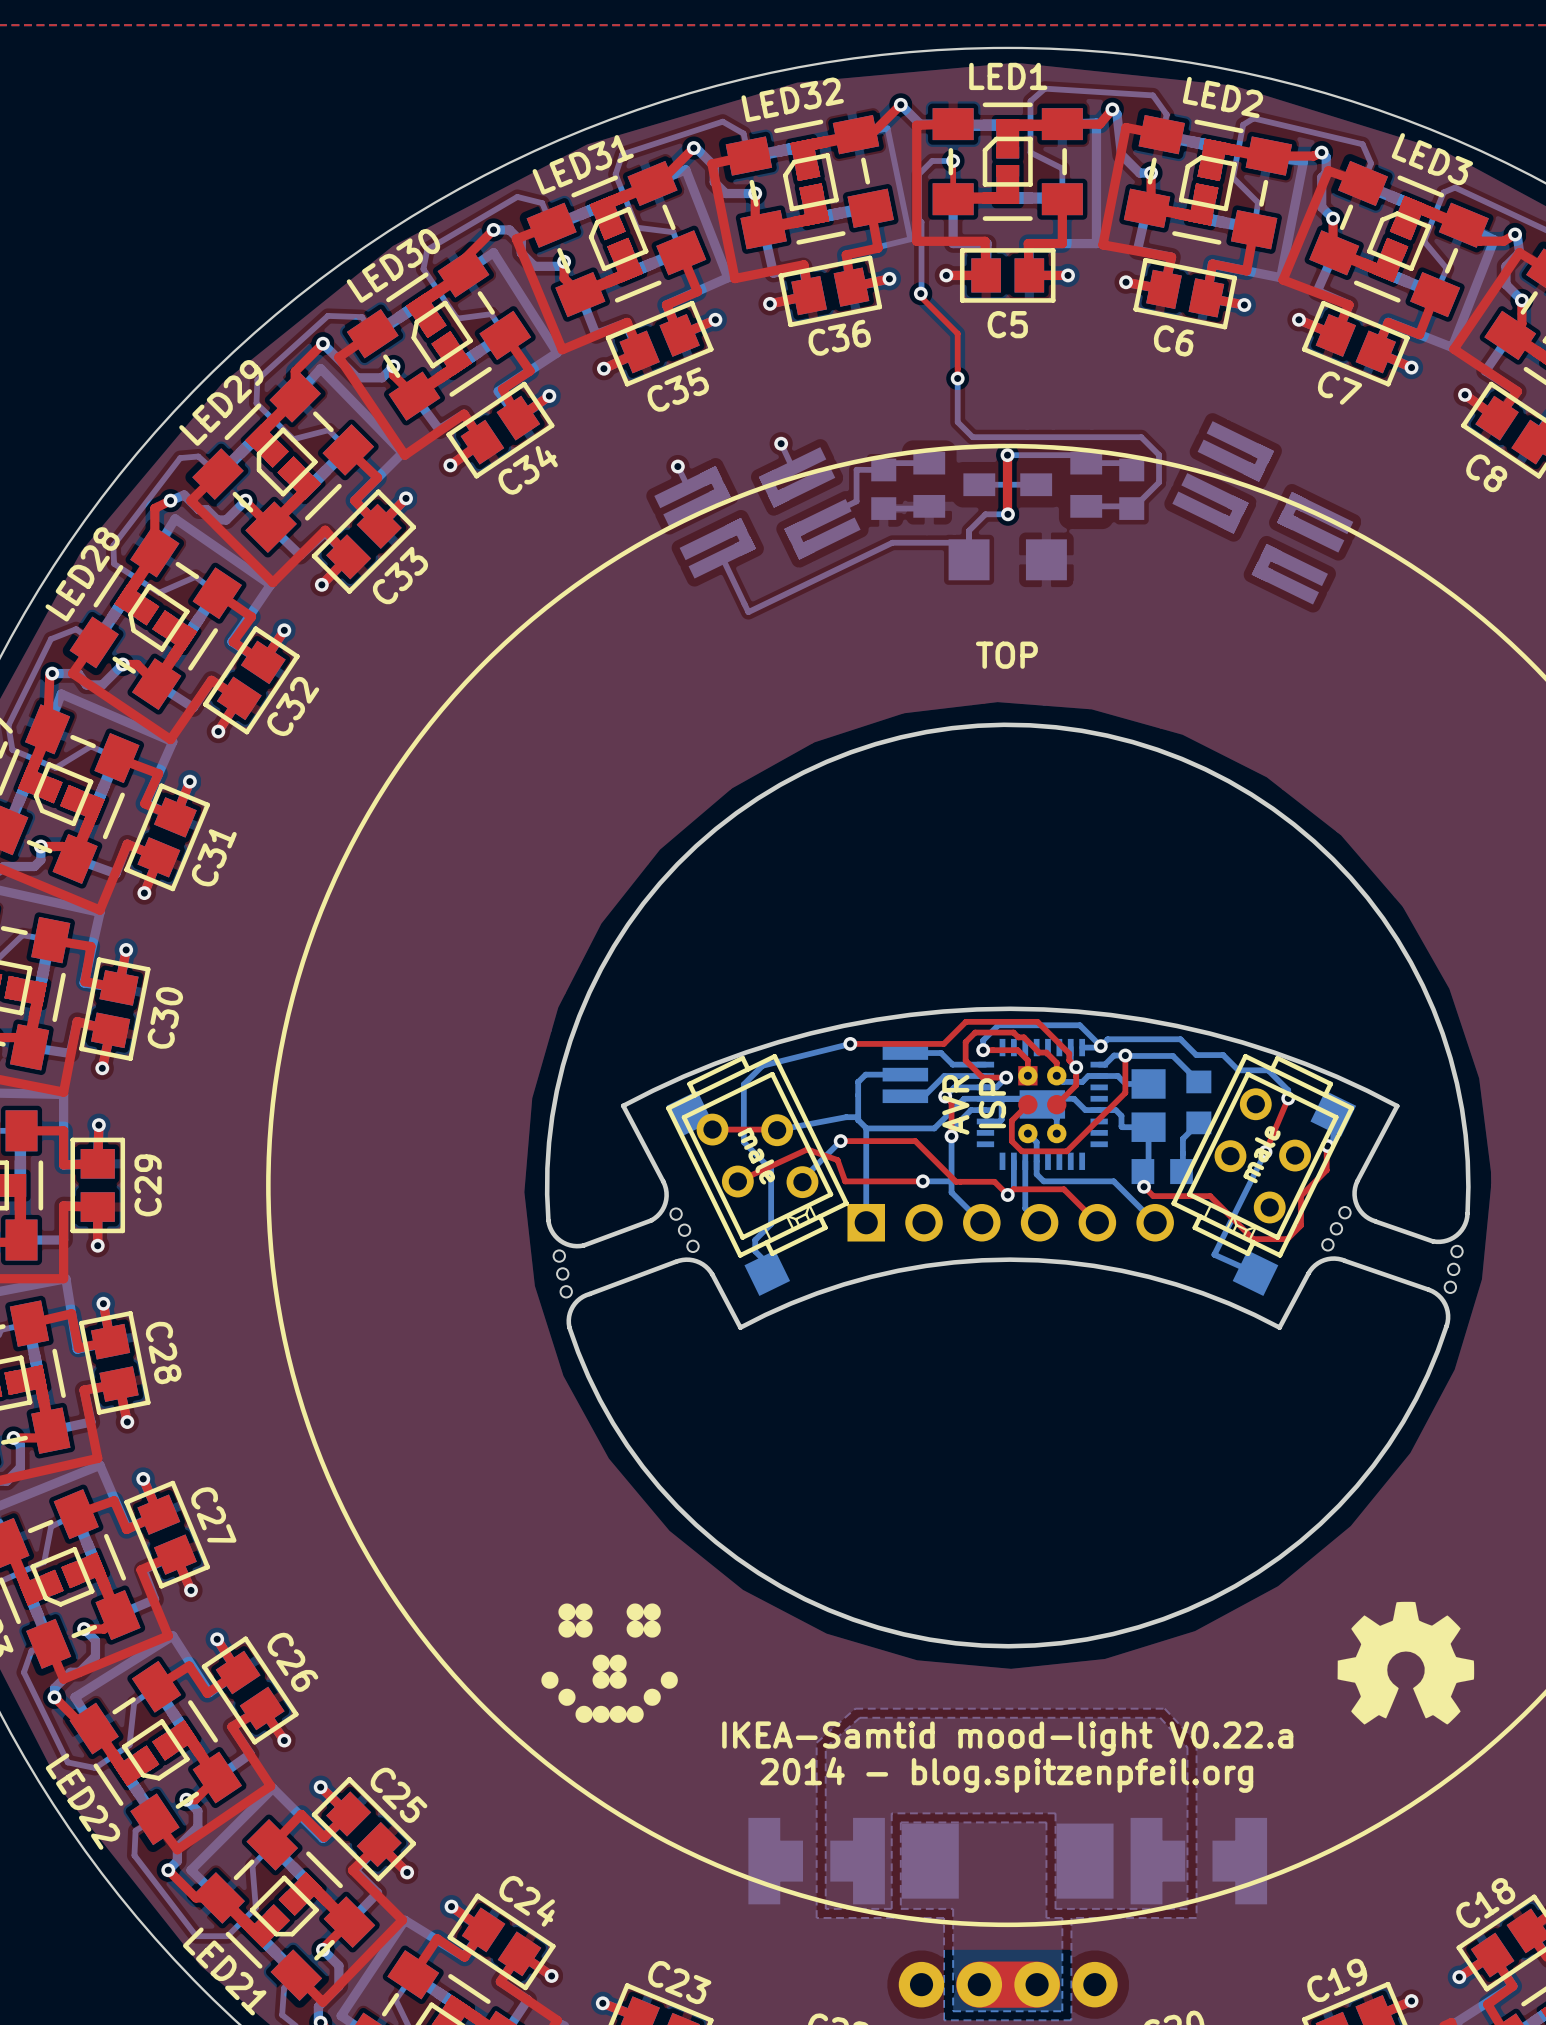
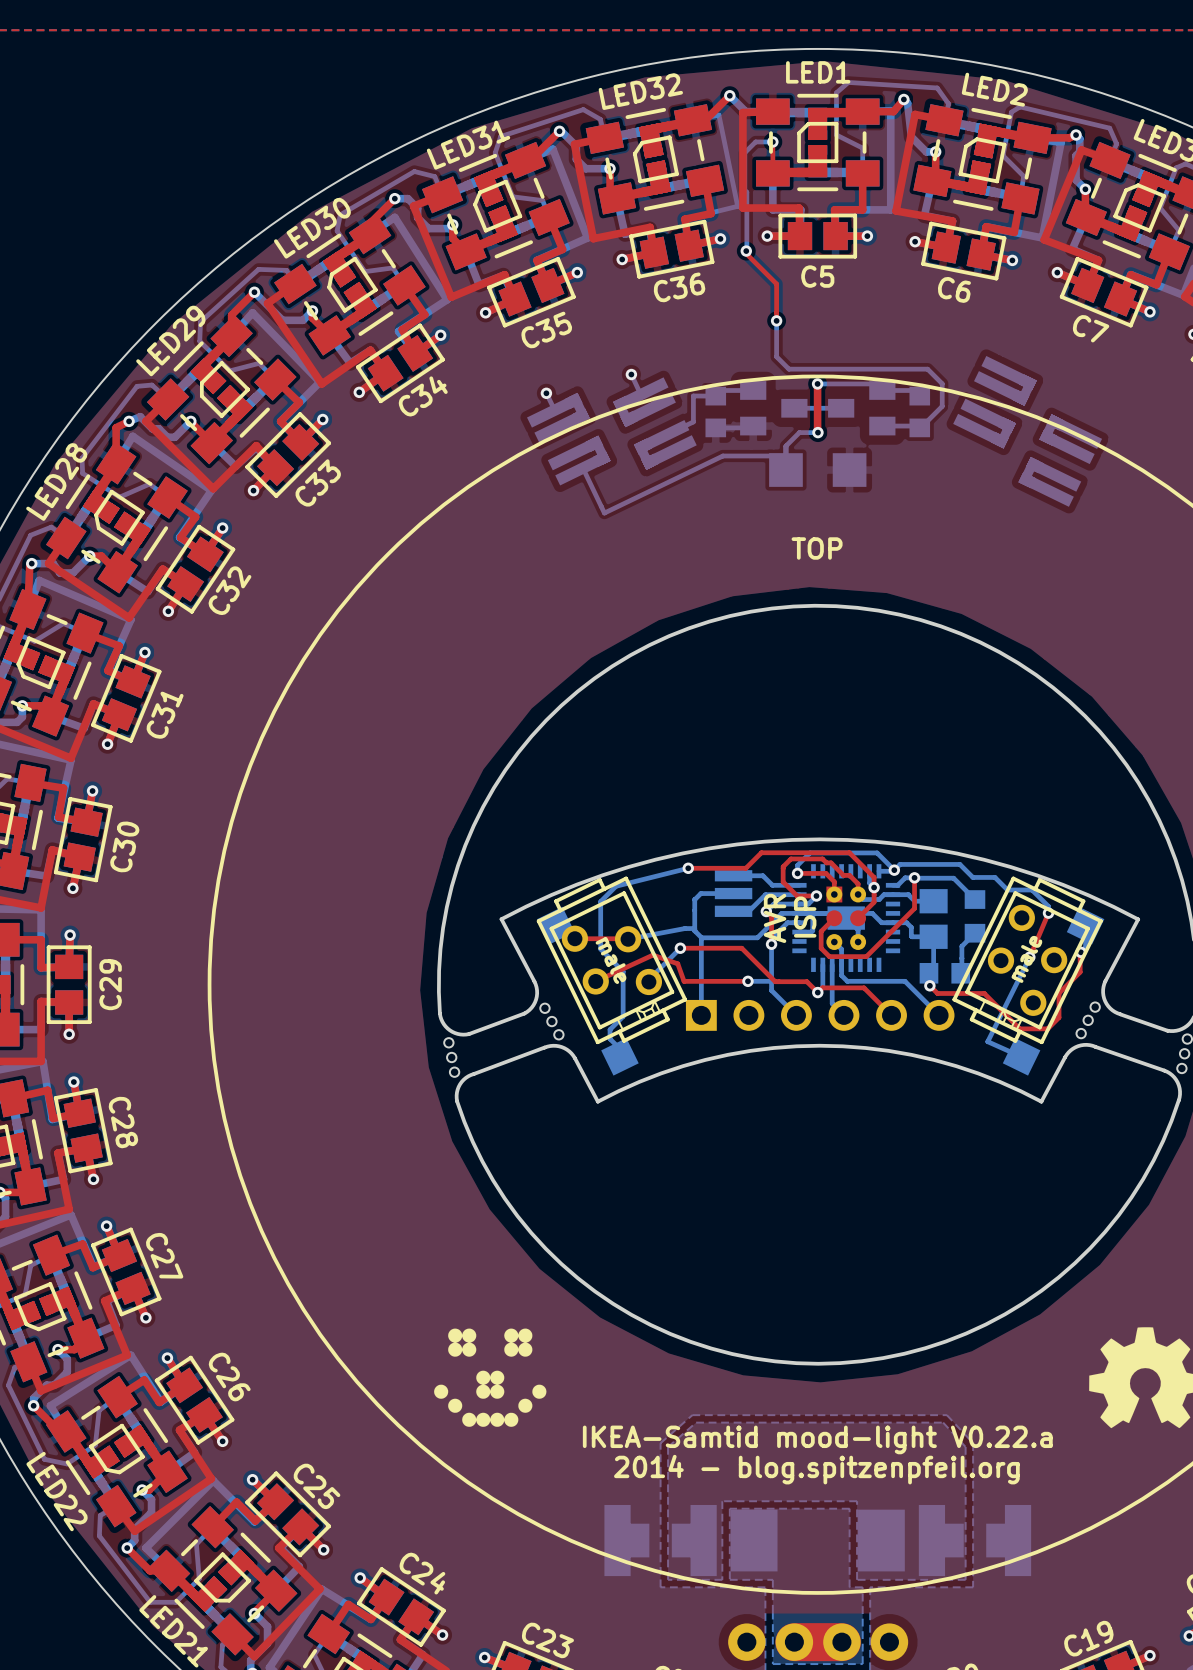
top track: (920, 1043) (943, 1043) (965, 1021) (1037, 1021) (1069, 1053) (1069, 1060) (1076, 1067) -> (745, 868) (761, 852) (849, 852) (874, 877) (874, 887)

